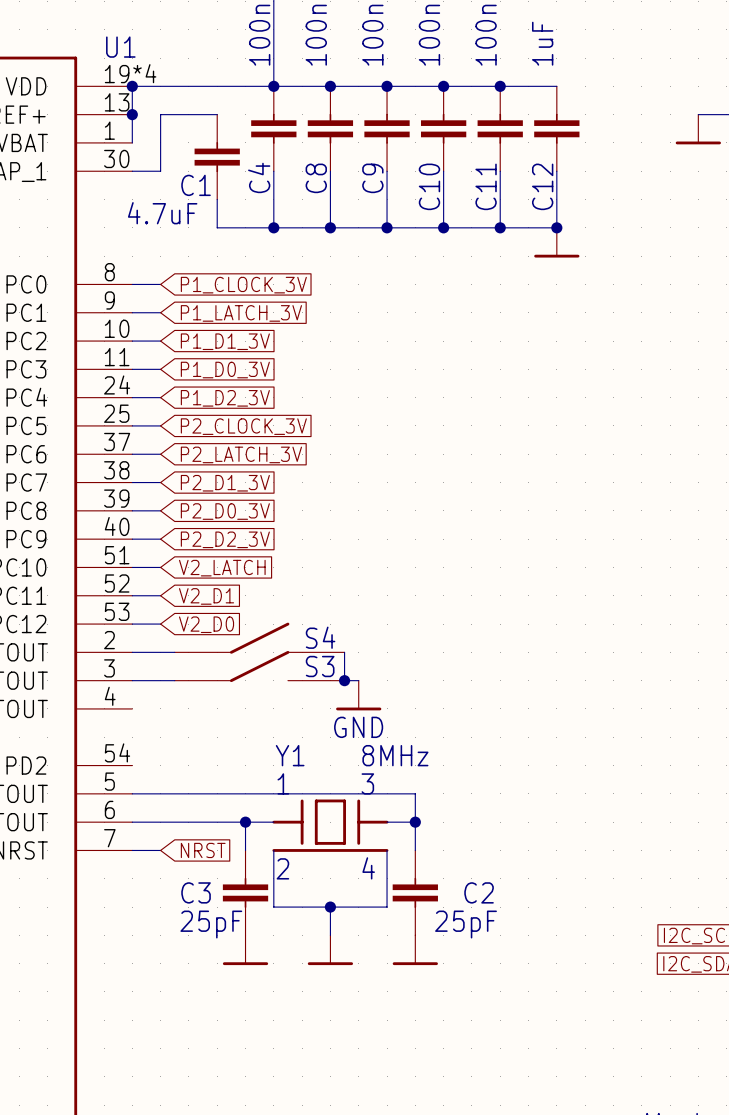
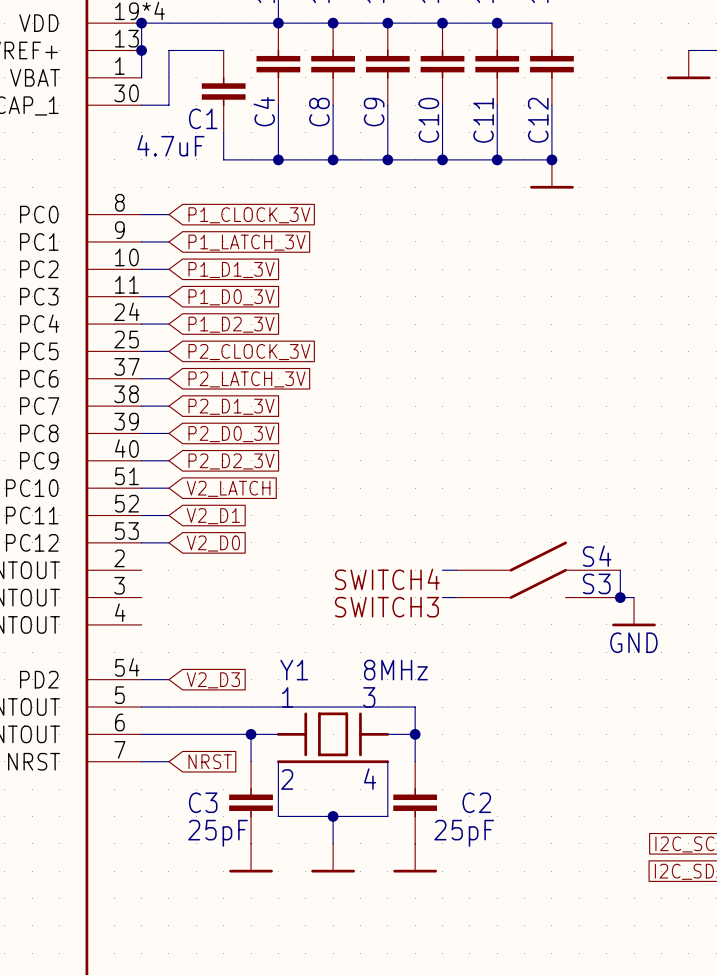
S4 position: (259, 638) -> (538, 556)
wire: (132, 652) (174, 652) -> none
wire: (344, 652) (344, 680) (358, 680) -> none
wire: none -> (442, 570) (456, 570)
wire: none -> (620, 570) (620, 597) (634, 597)
label: none -> SWITCH4 (387, 579)
S3 position: (259, 666) -> (538, 583)
wire: (132, 680) (174, 680) -> none
junction: (344, 680) -> none
wire: none -> (442, 597) (456, 597)
junction: none -> (620, 597)
label: none -> SWITCH3 (386, 607)
power symbol: GND (358, 695) -> none
power symbol: none -> GND (634, 611)
wire: none -> (141, 679) (168, 679)
global label: none -> V2_D3 (213, 680)

